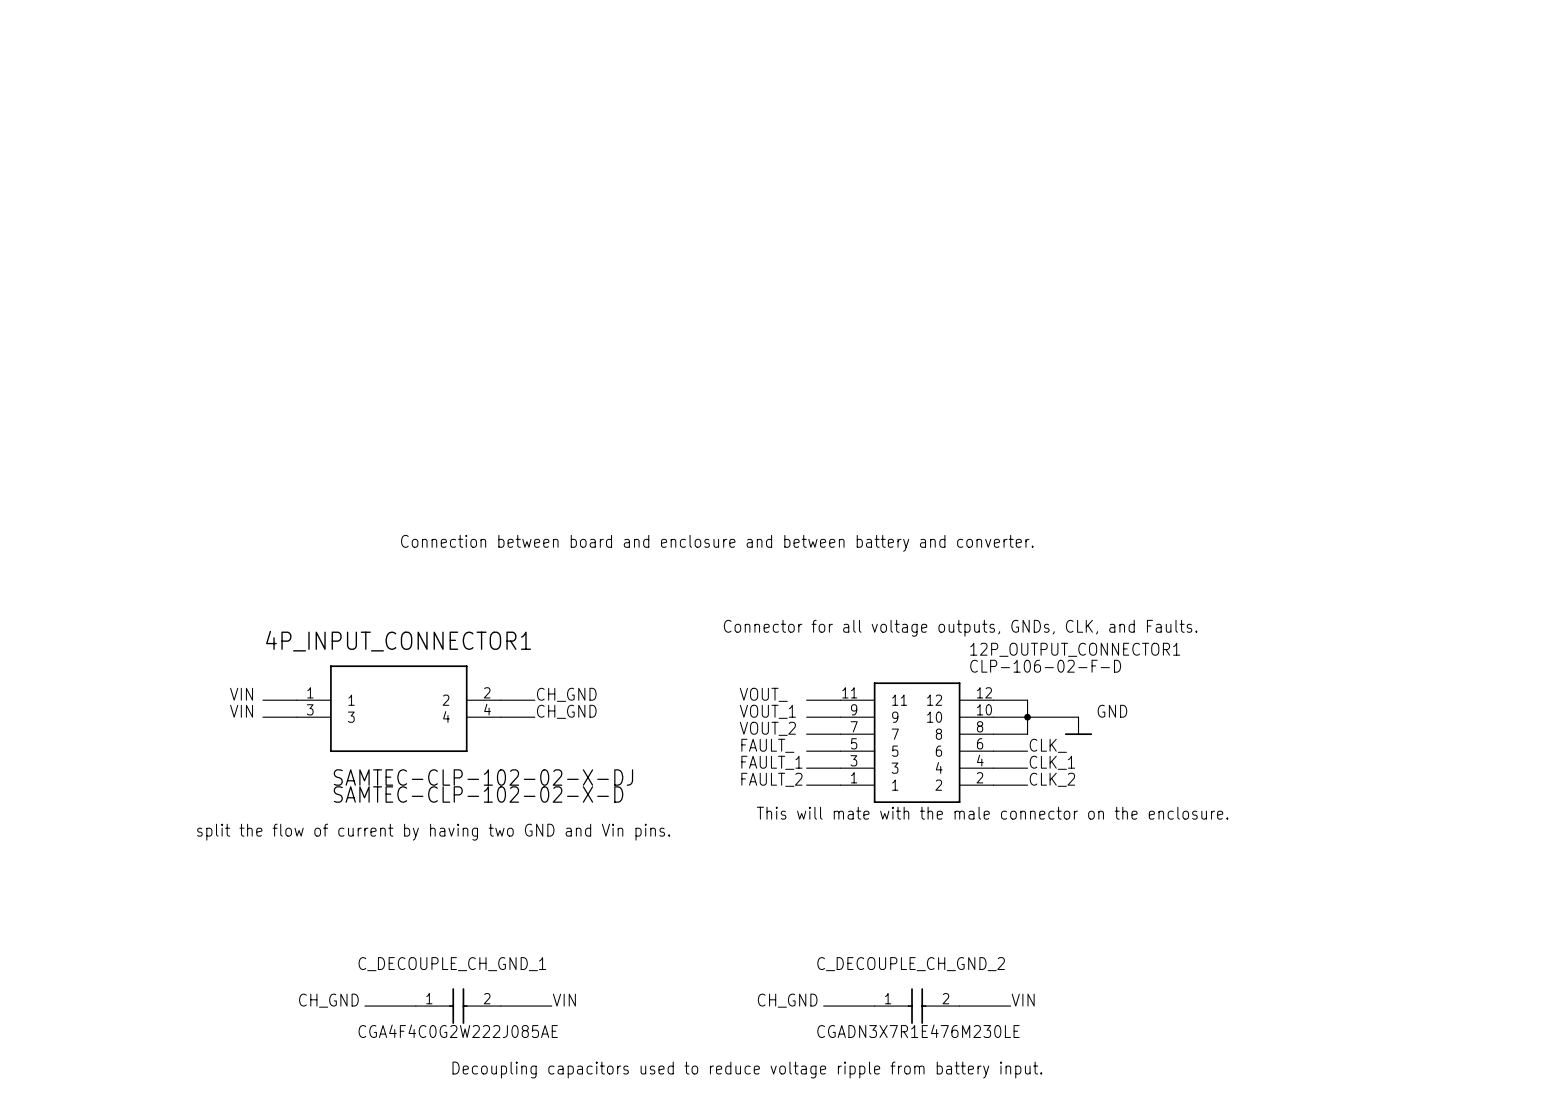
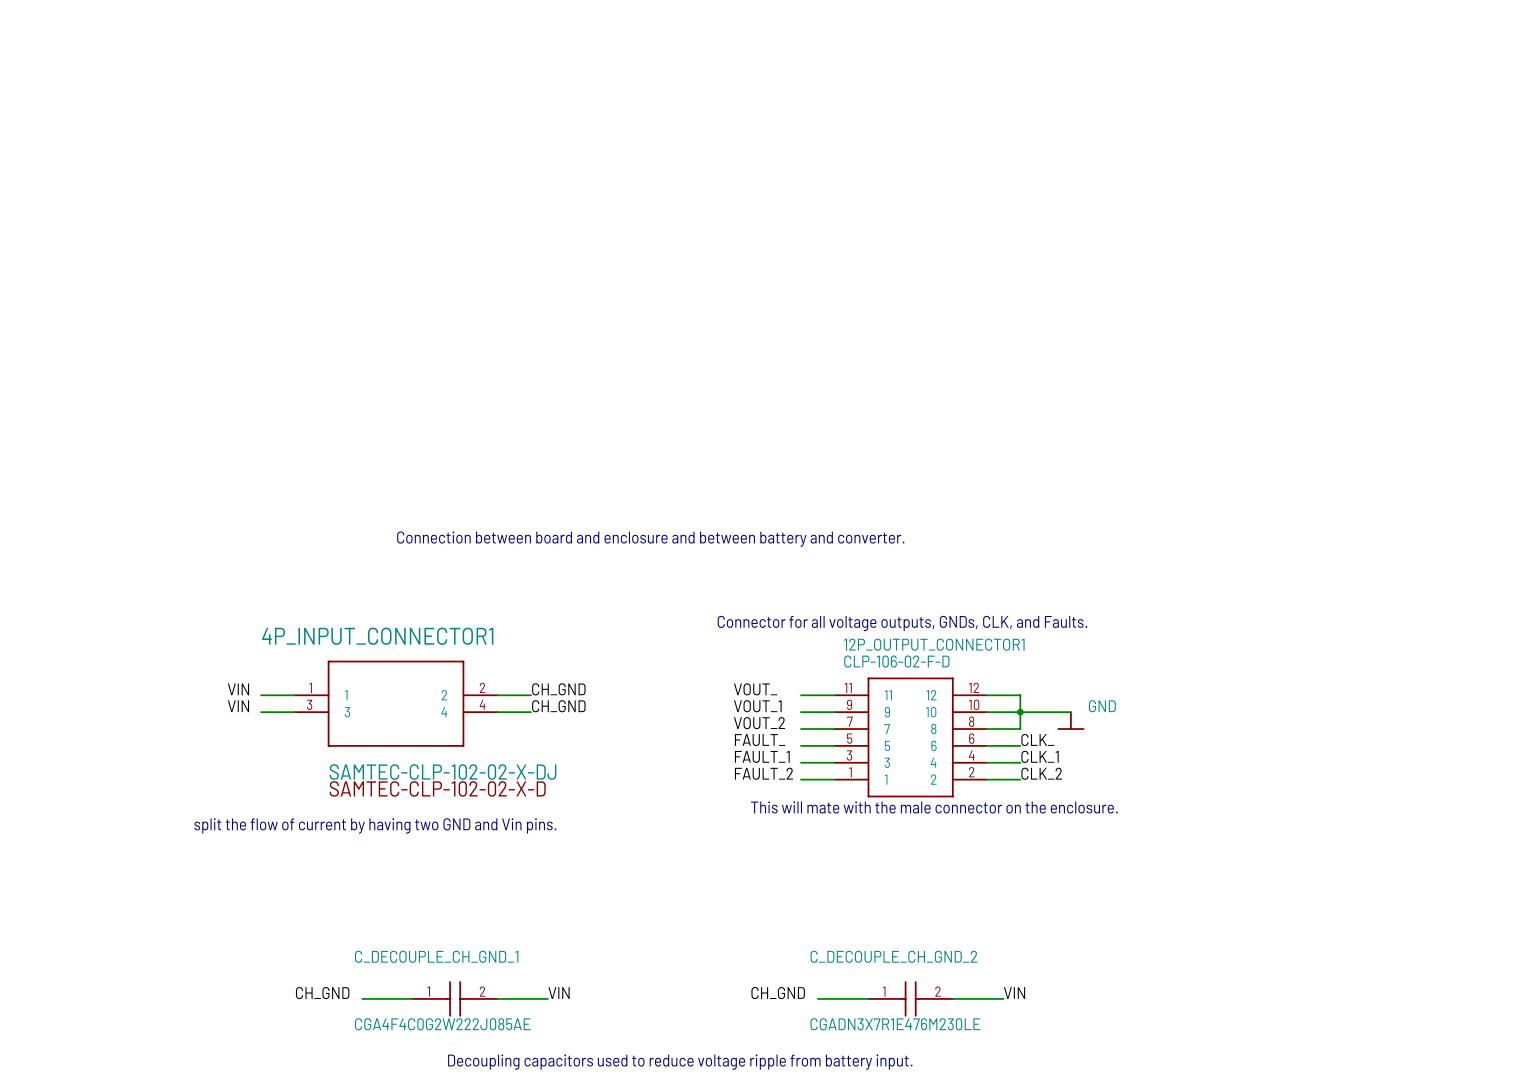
12P_OUTPUT_CONNECTOR1 name position: 12P_OUTPUT_CONNECTOR1 (1075, 649) -> 12P_OUTPUT_CONNECTOR1 (934, 644)
12P_OUTPUT_CONNECTOR1 value position: CLP-106-02-F-D (1045, 666) -> CLP-106-02-F-D (896, 661)

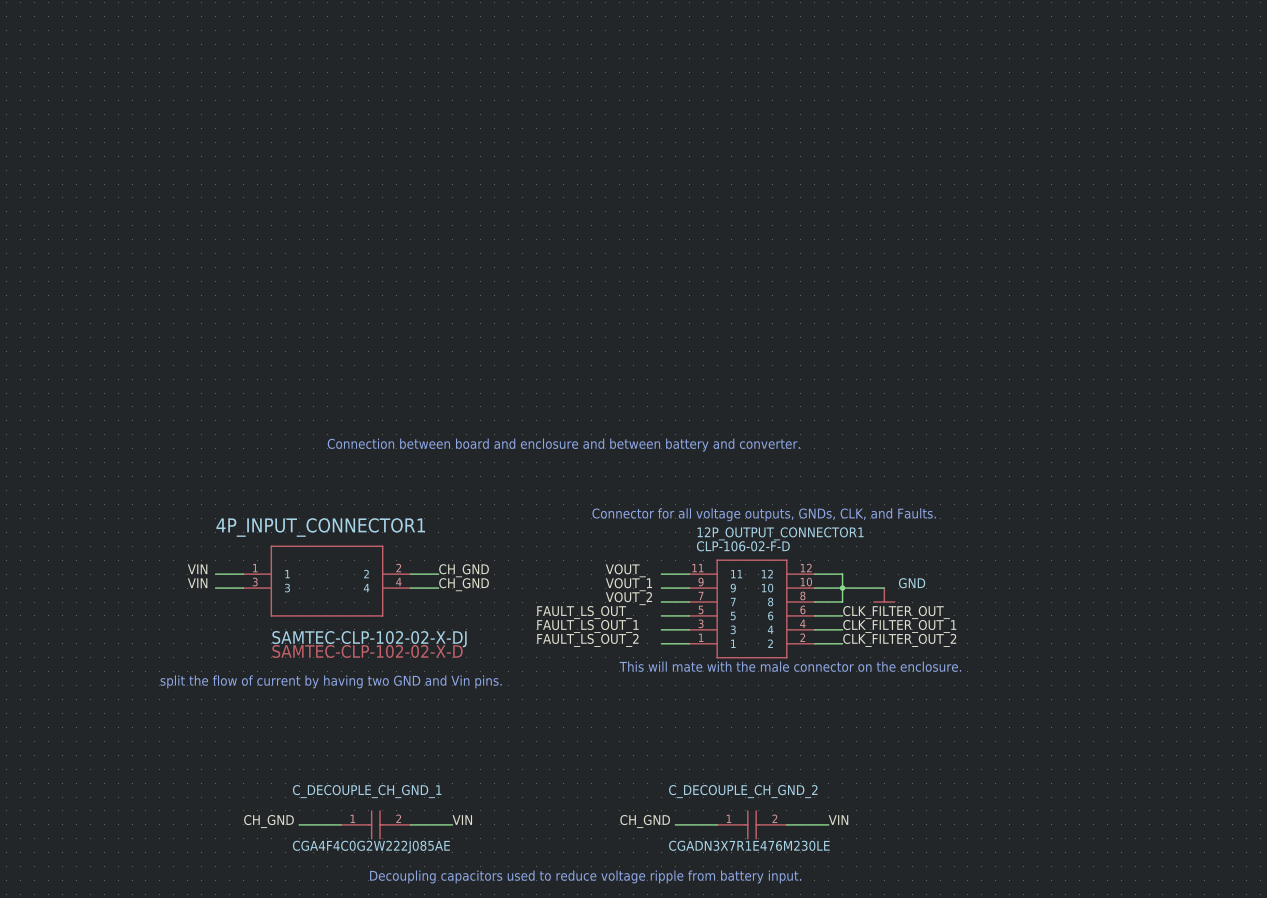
label: CLK_ (1037, 739) -> CLK_FILTER_OUT_ (896, 612)
label: FAULT_ (760, 740) -> FAULT_LS_OUT_ (584, 612)
label: FAULT_1 (762, 756) -> FAULT_LS_OUT_1 (587, 626)
label: CLK_1 (1040, 756) -> CLK_FILTER_OUT_1 (899, 626)
label: FAULT_2 (763, 773) -> FAULT_LS_OUT_2 (587, 640)
label: CLK_2 (1041, 773) -> CLK_FILTER_OUT_2 (899, 640)

